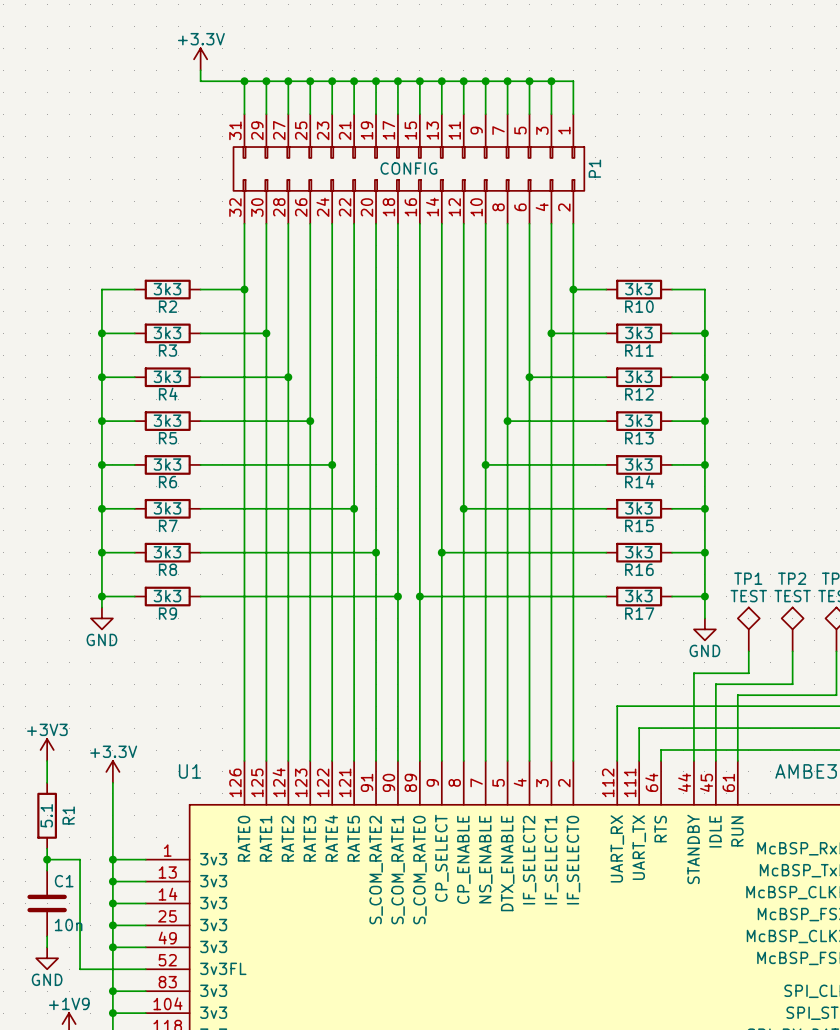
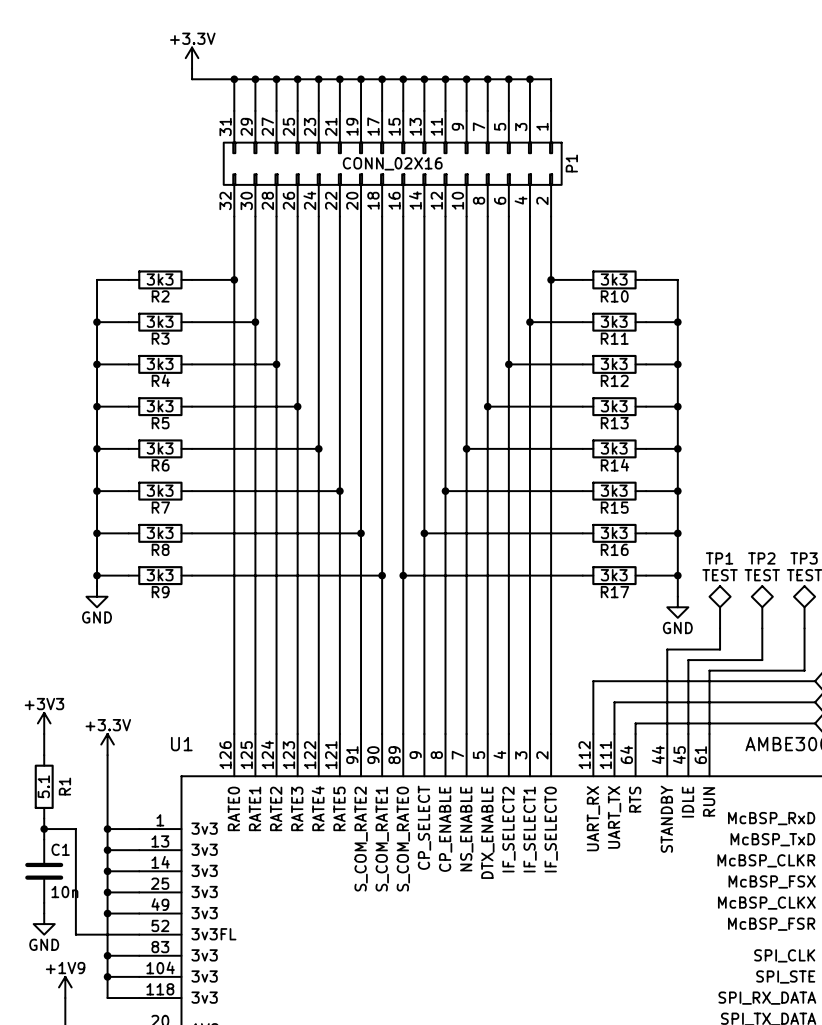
P1 value: CONFIG (408, 168) -> CONN_02X16 (392, 163)

